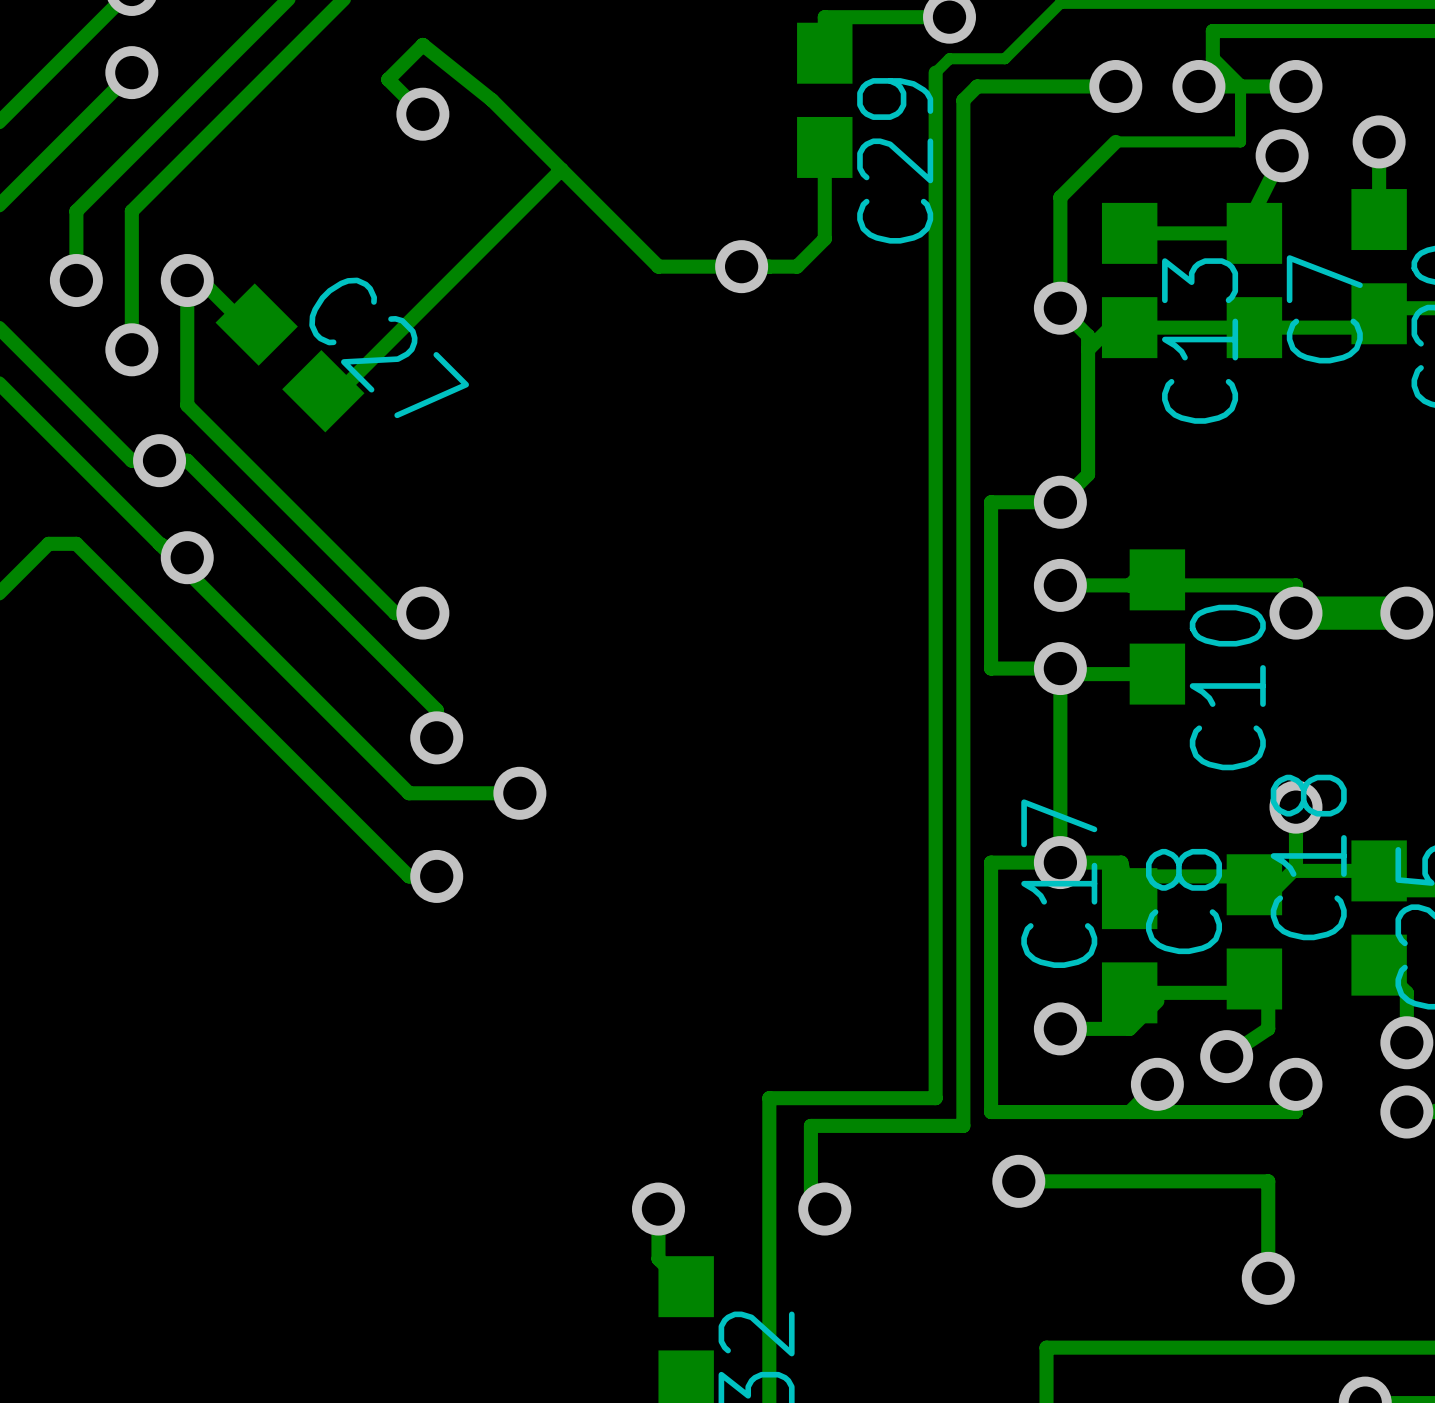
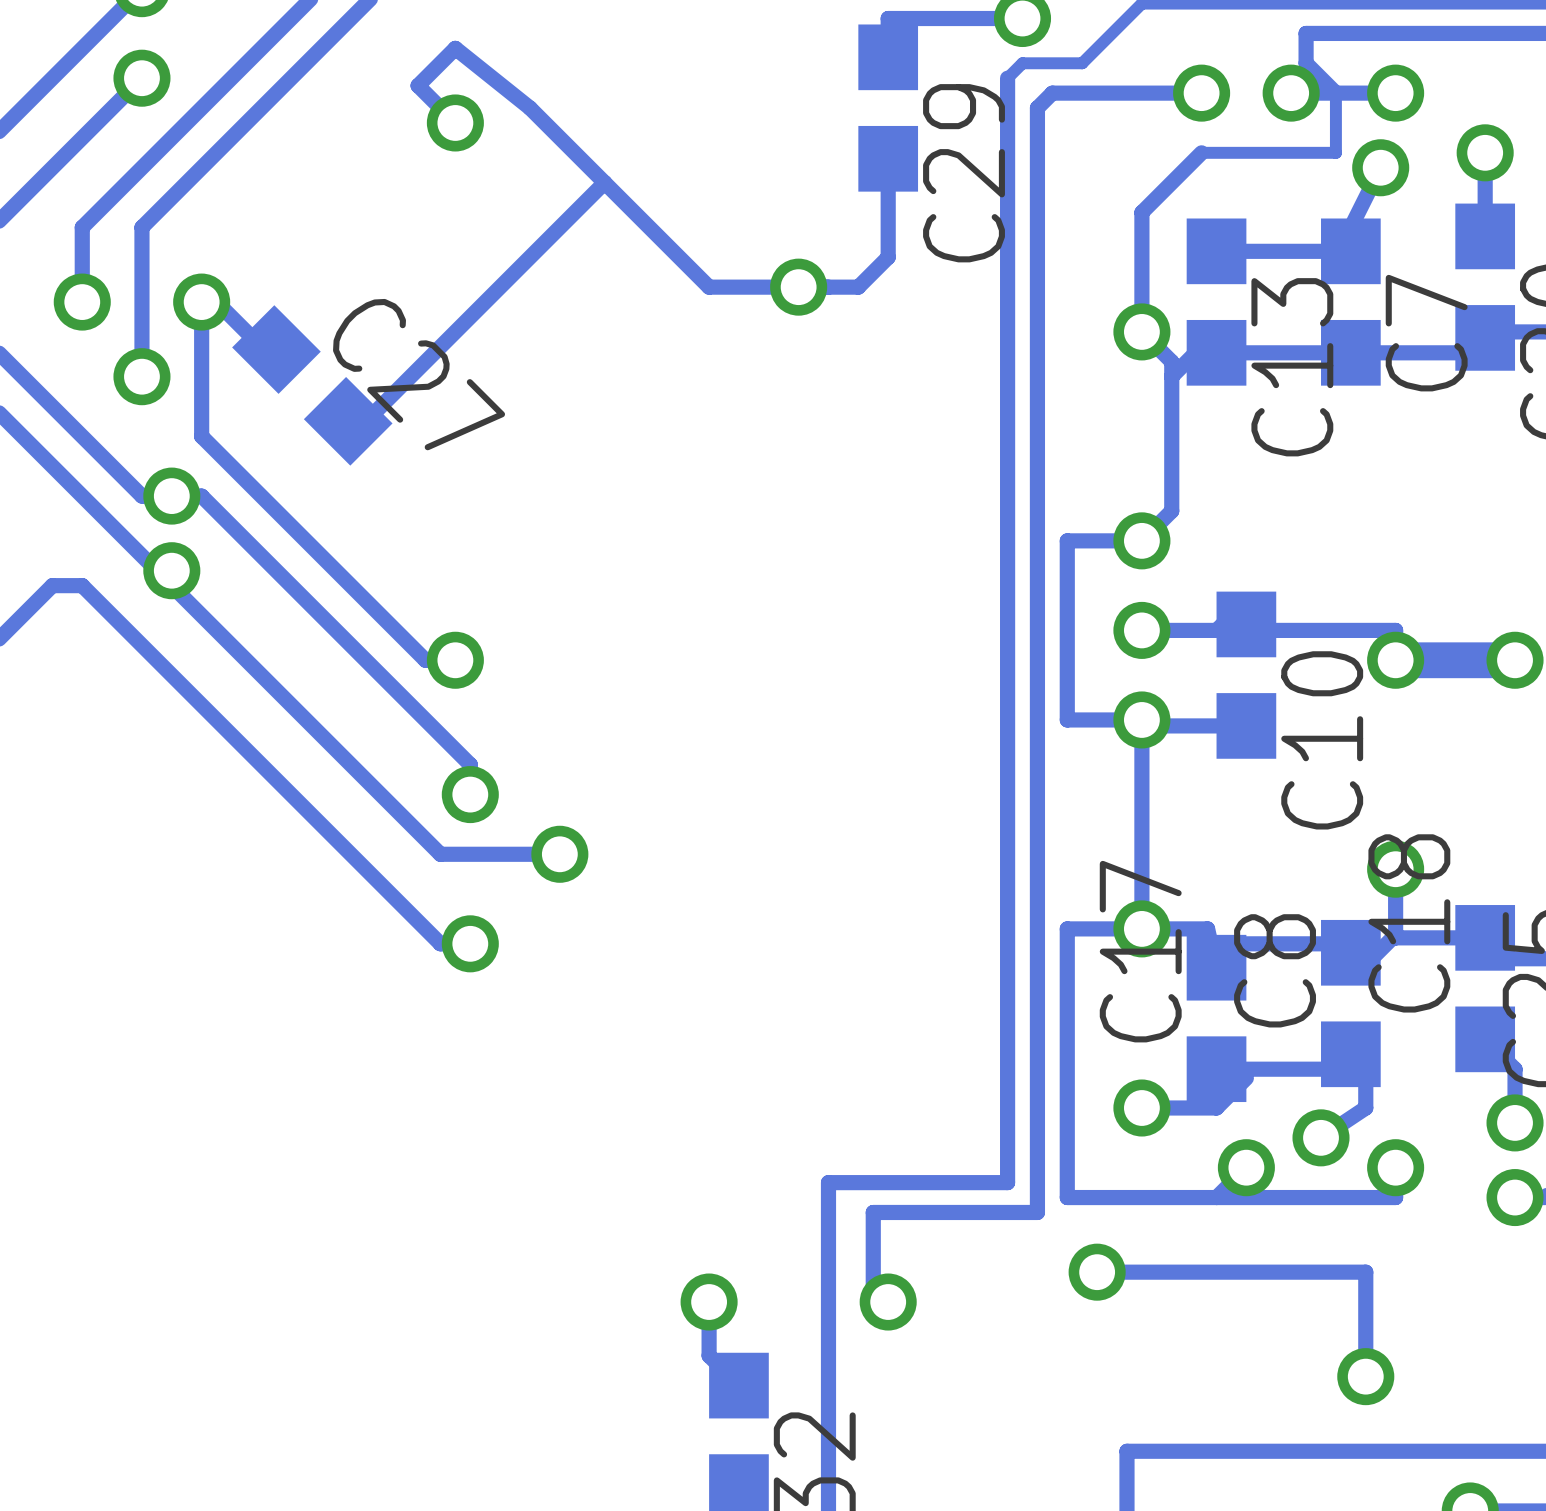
via position: (187, 557) -> (171, 570)

